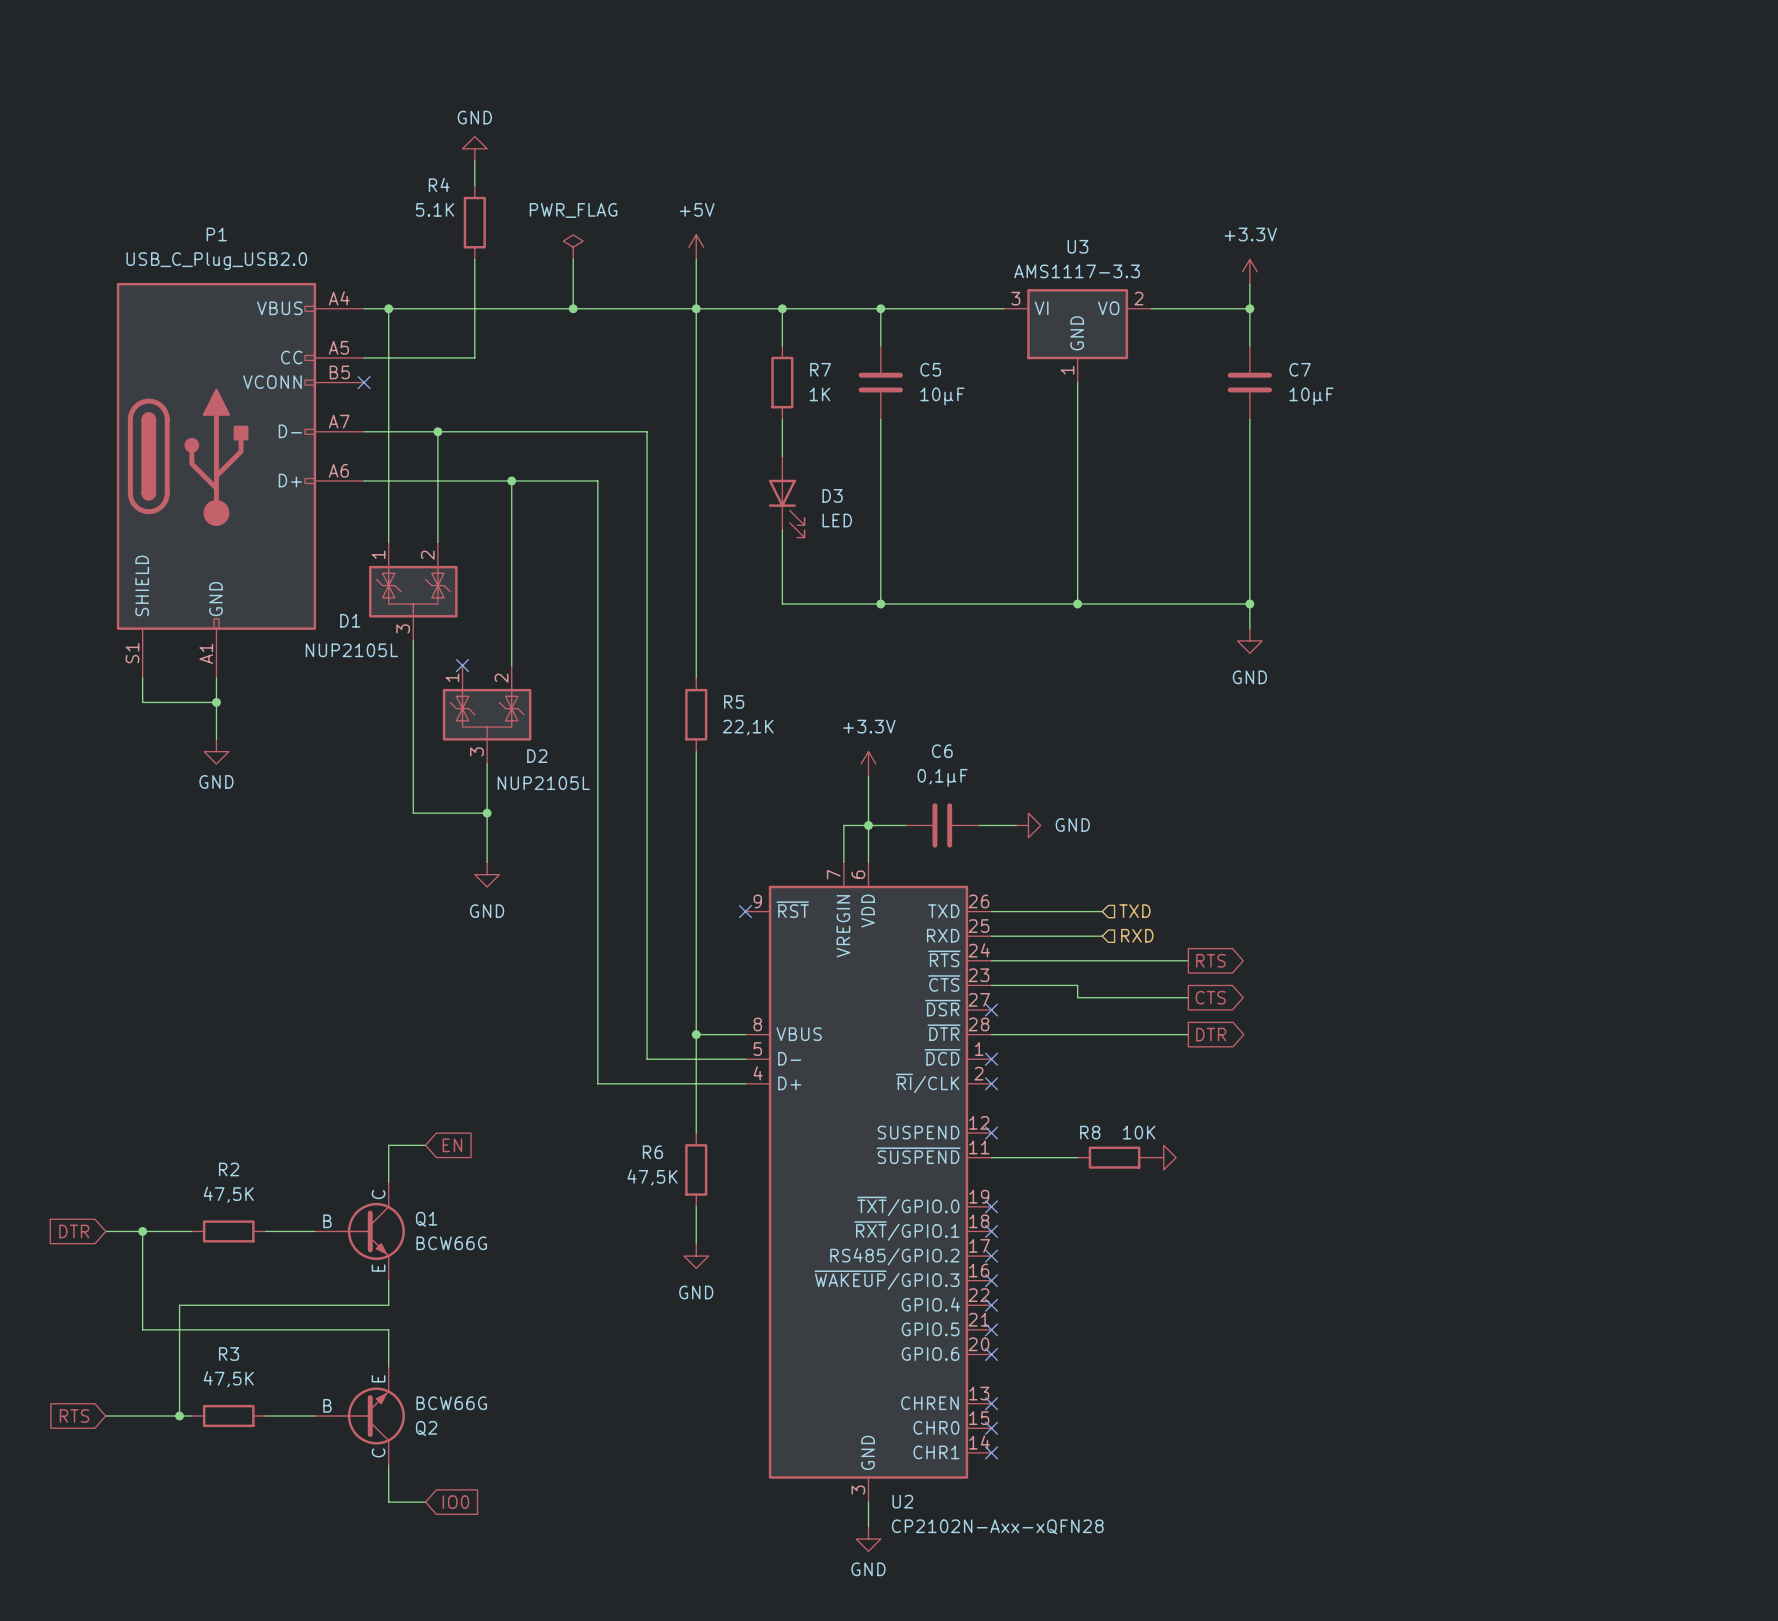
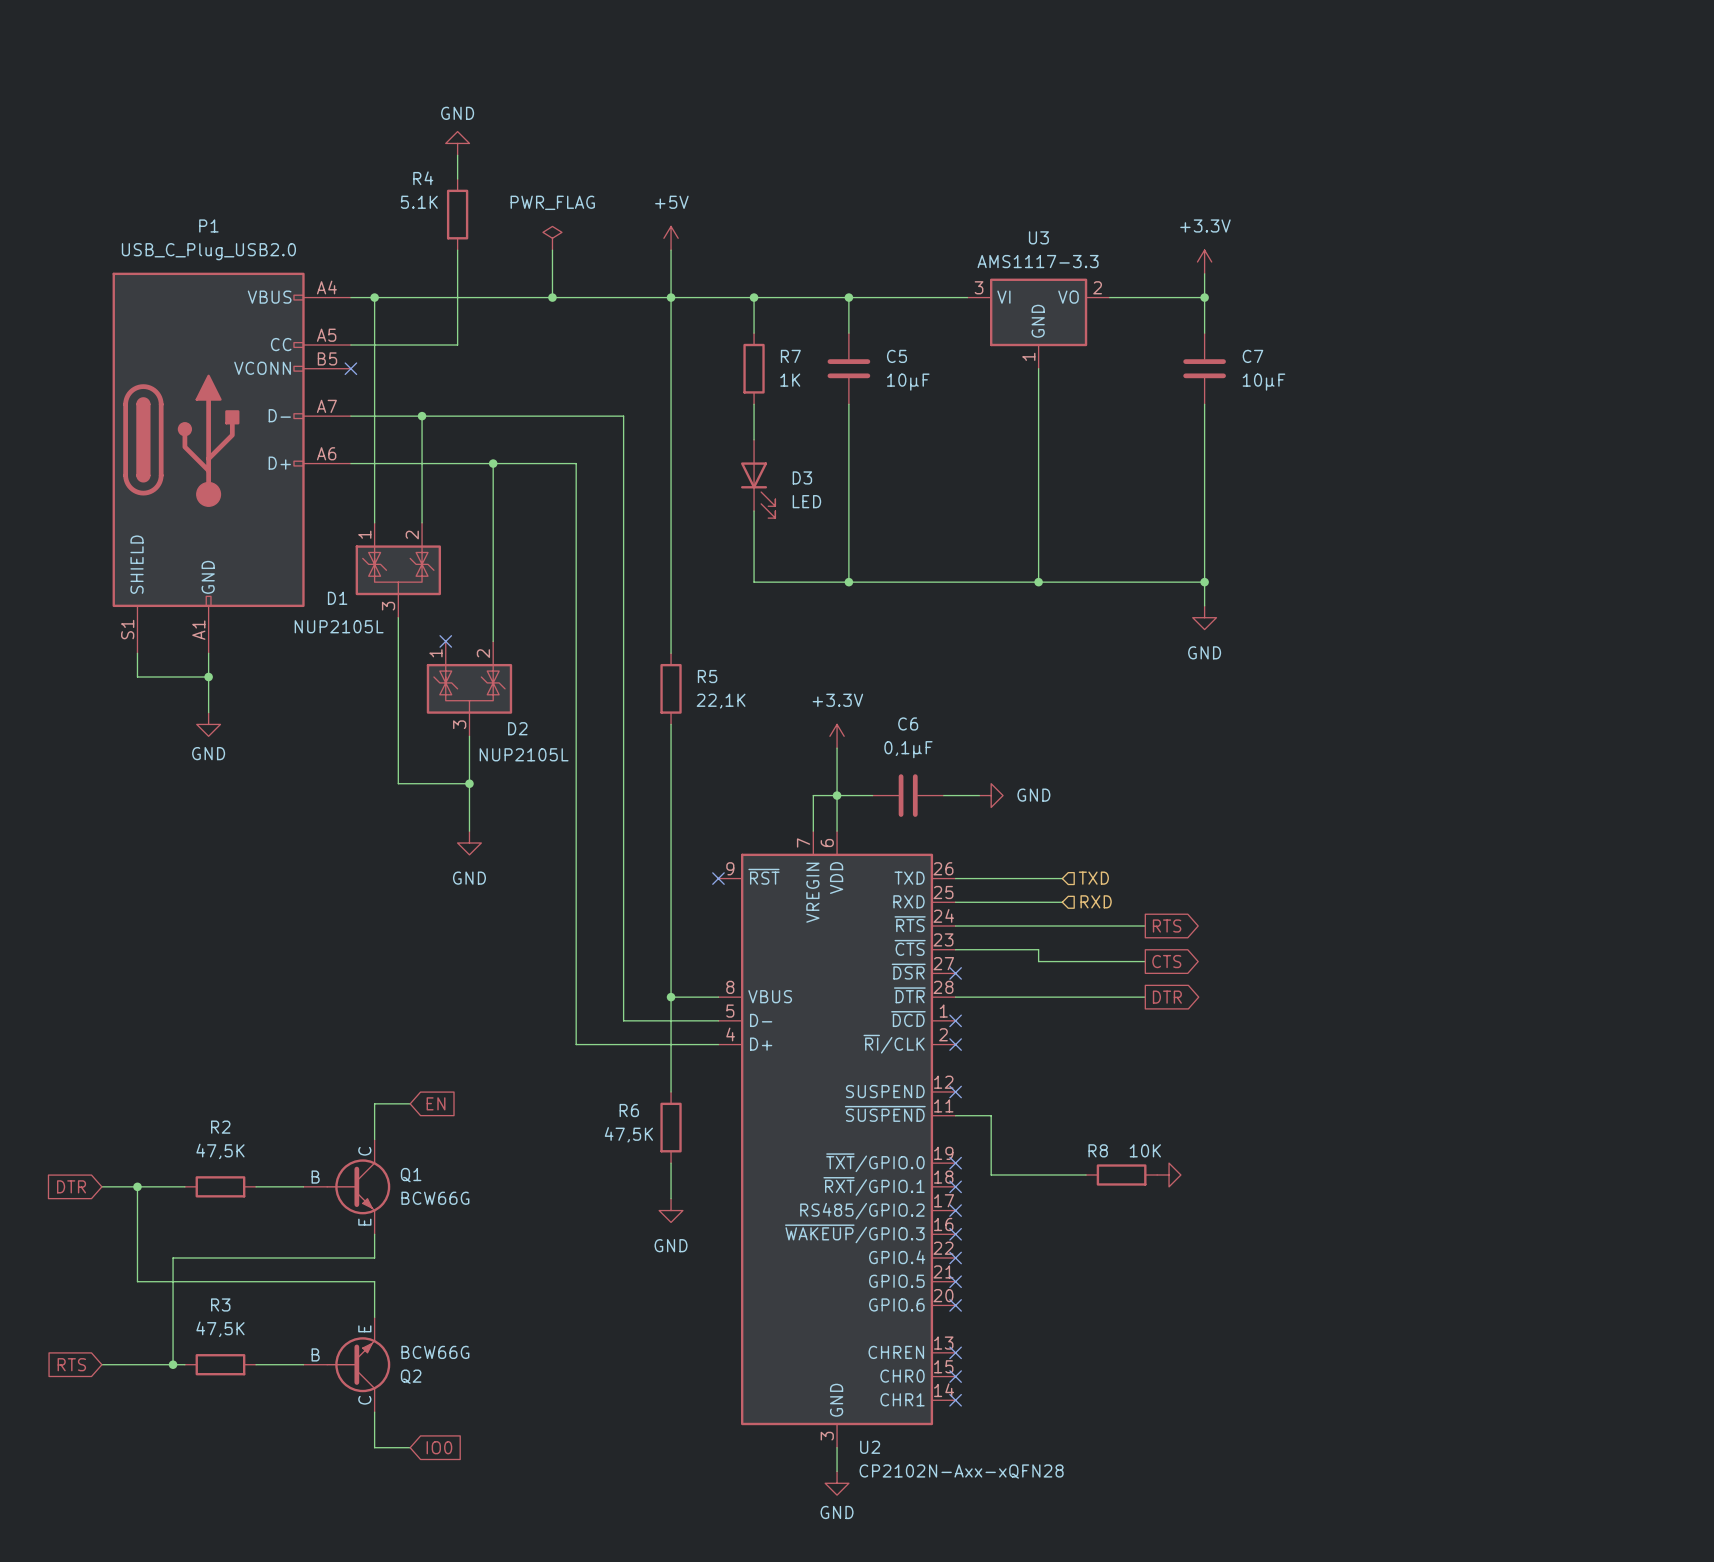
wire: (1028, 1157) (1077, 1157) -> (991, 1115) (991, 1174) (1086, 1174)
R8 position: (1114, 1157) -> (1121, 1174)
power symbol position: (1163, 1157) -> (1169, 1174)

